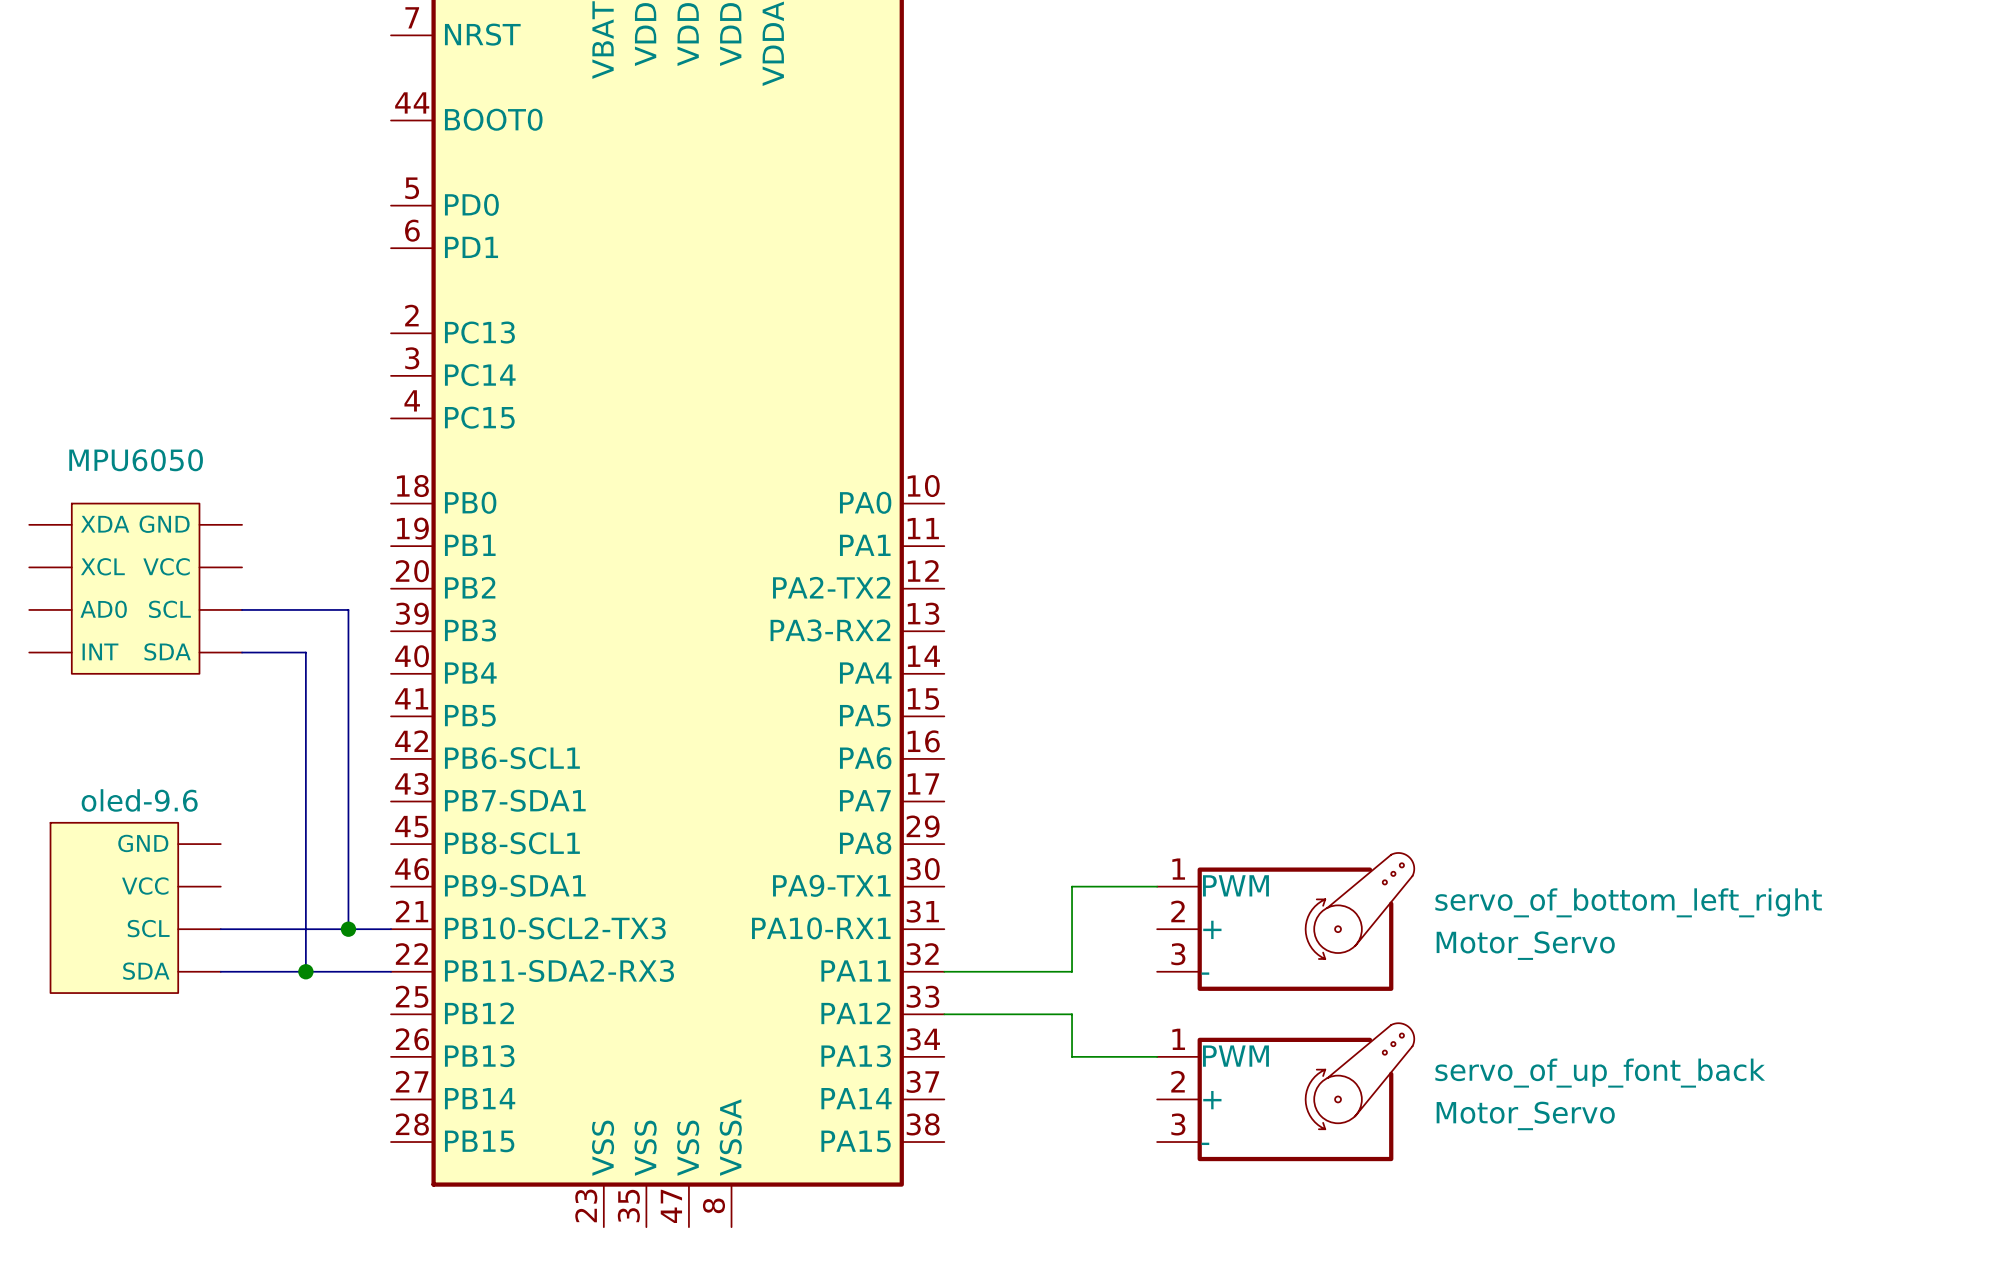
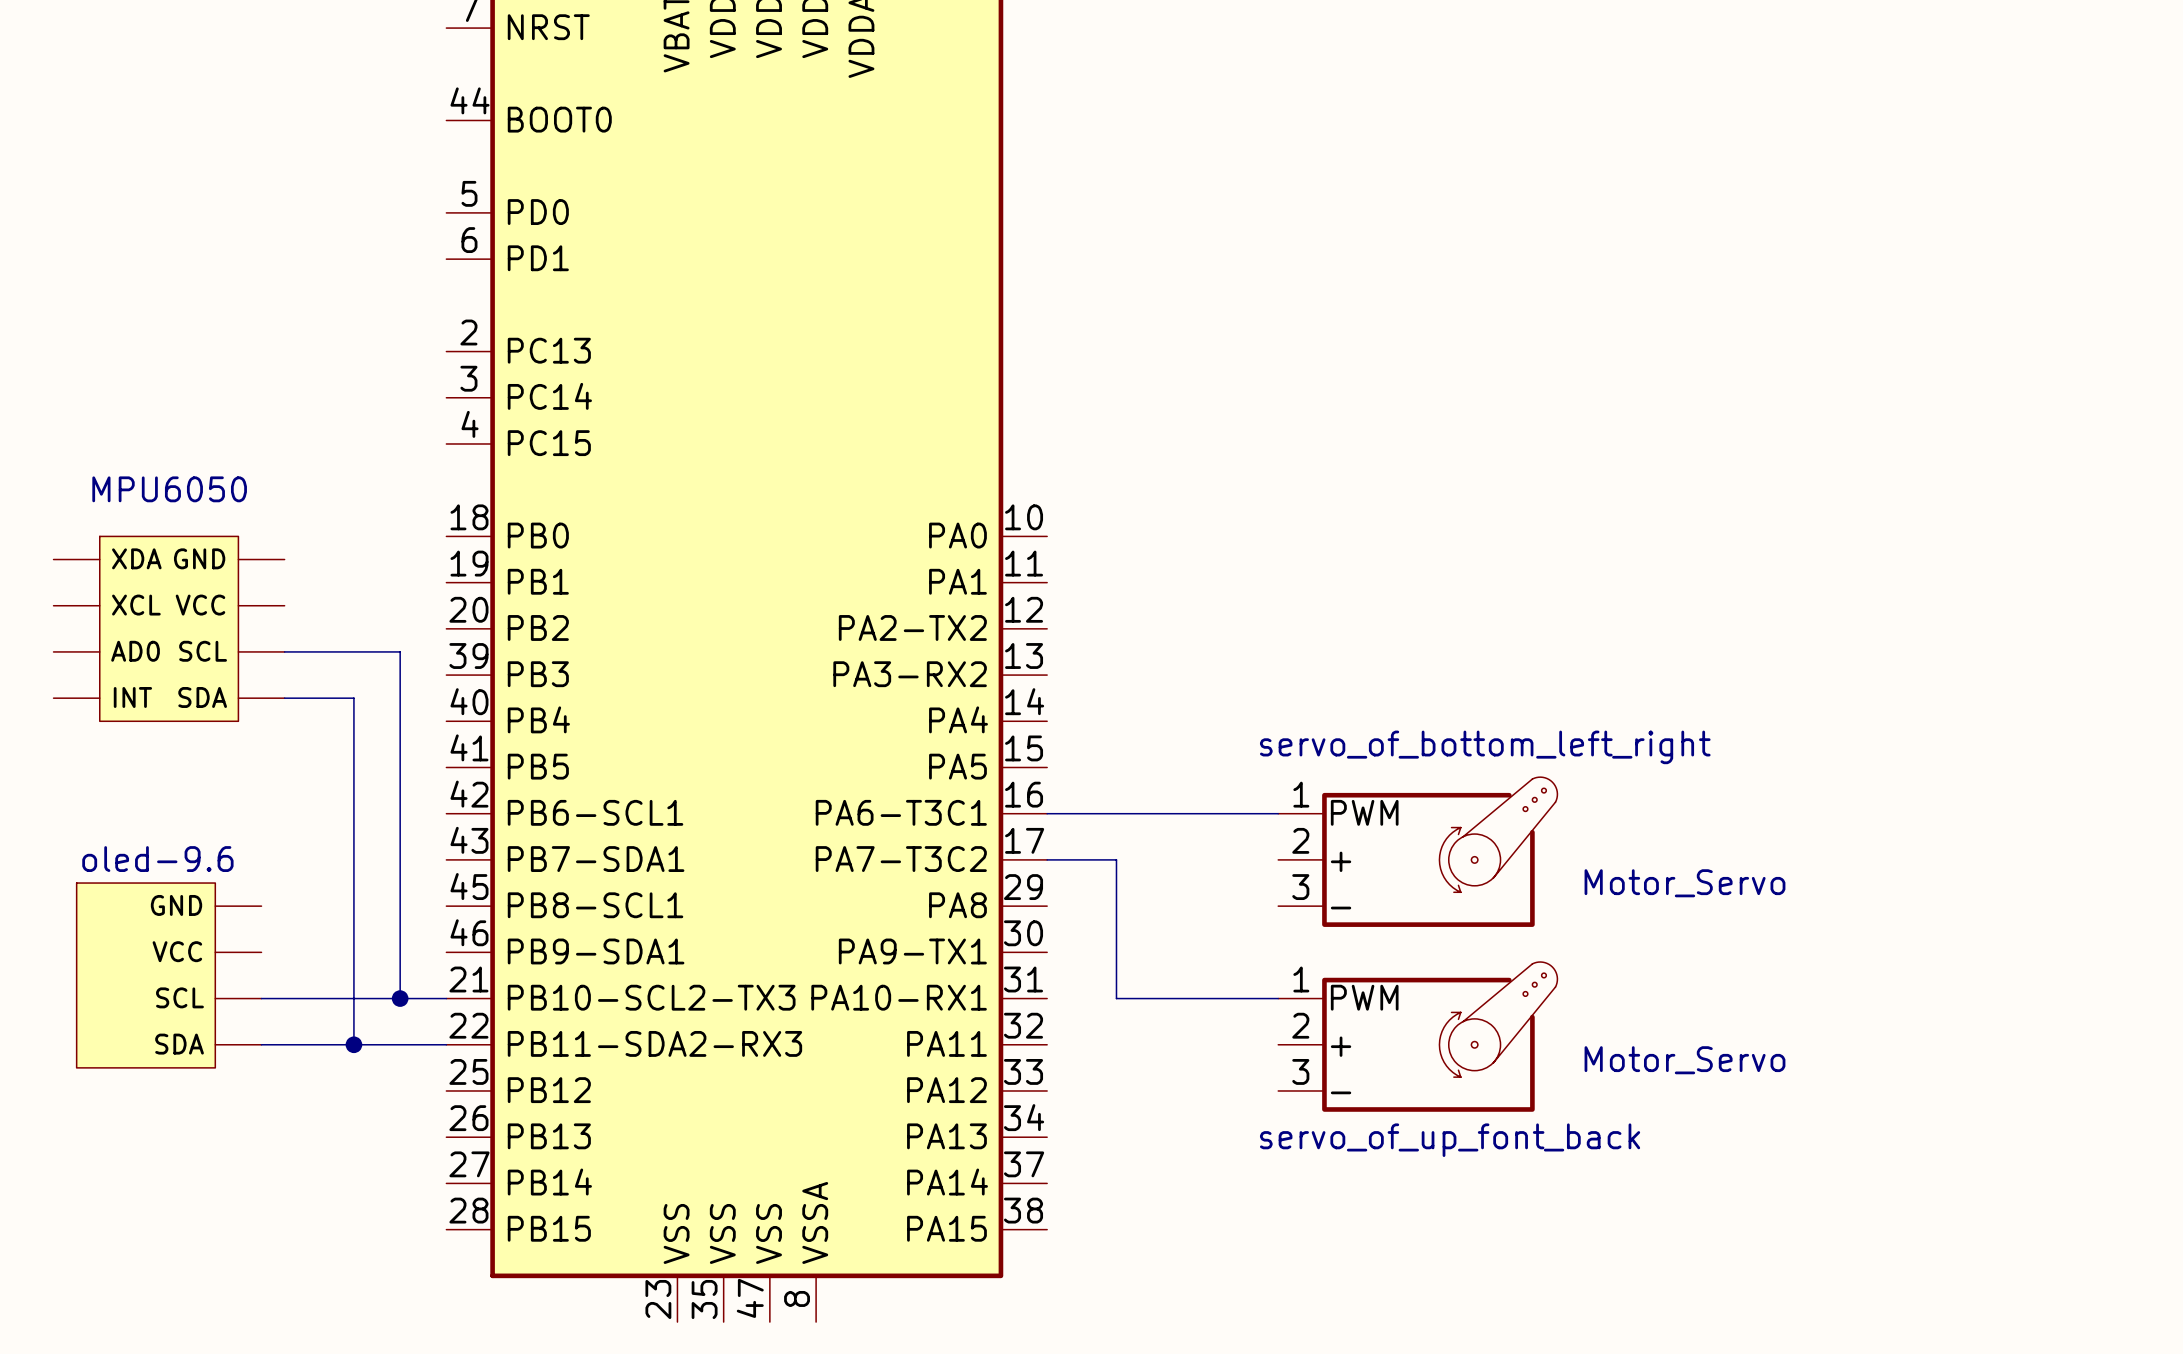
part pin name: PA6 (865, 758) -> PA6-T3C1 (901, 812)
wire: none -> (1047, 813) (1278, 813)
part pin name: PA7 (865, 800) -> PA7-T3C2 (901, 859)
wire: none -> (1047, 859) (1116, 859) (1116, 998) (1278, 998)
wire: (1157, 886) (1072, 886) (1072, 971) (944, 971) -> none
servo_of_bottom_left_right name position: servo_of_bottom_left_right (1628, 902) -> servo_of_bottom_left_right (1485, 747)
servo_of_bottom_left_right position: (1285, 921) -> (1417, 852)
servo_of_bottom_left_right value position: Motor_Servo (1525, 945) -> Motor_Servo (1684, 883)
wire: (944, 1014) (1072, 1014) (1072, 1056) (1157, 1056) -> none
servo_of_up_font_back name position: servo_of_up_font_back (1600, 1073) -> servo_of_up_font_back (1450, 1140)
servo_of_up_font_back position: (1285, 1092) -> (1417, 1036)

